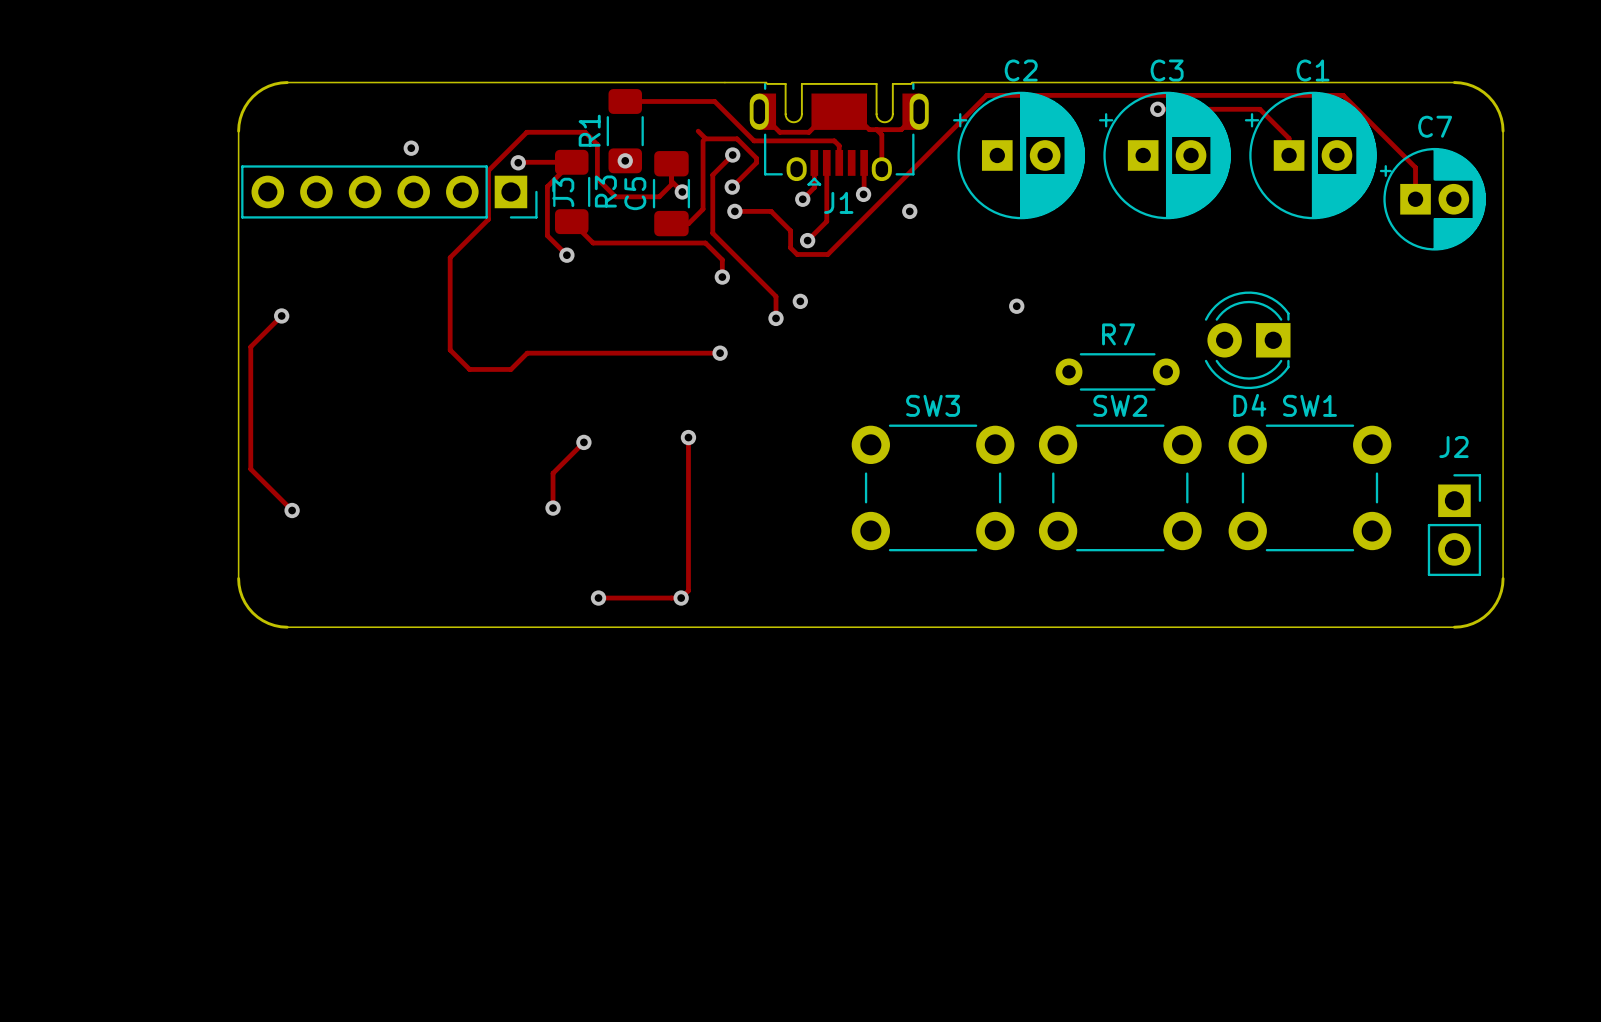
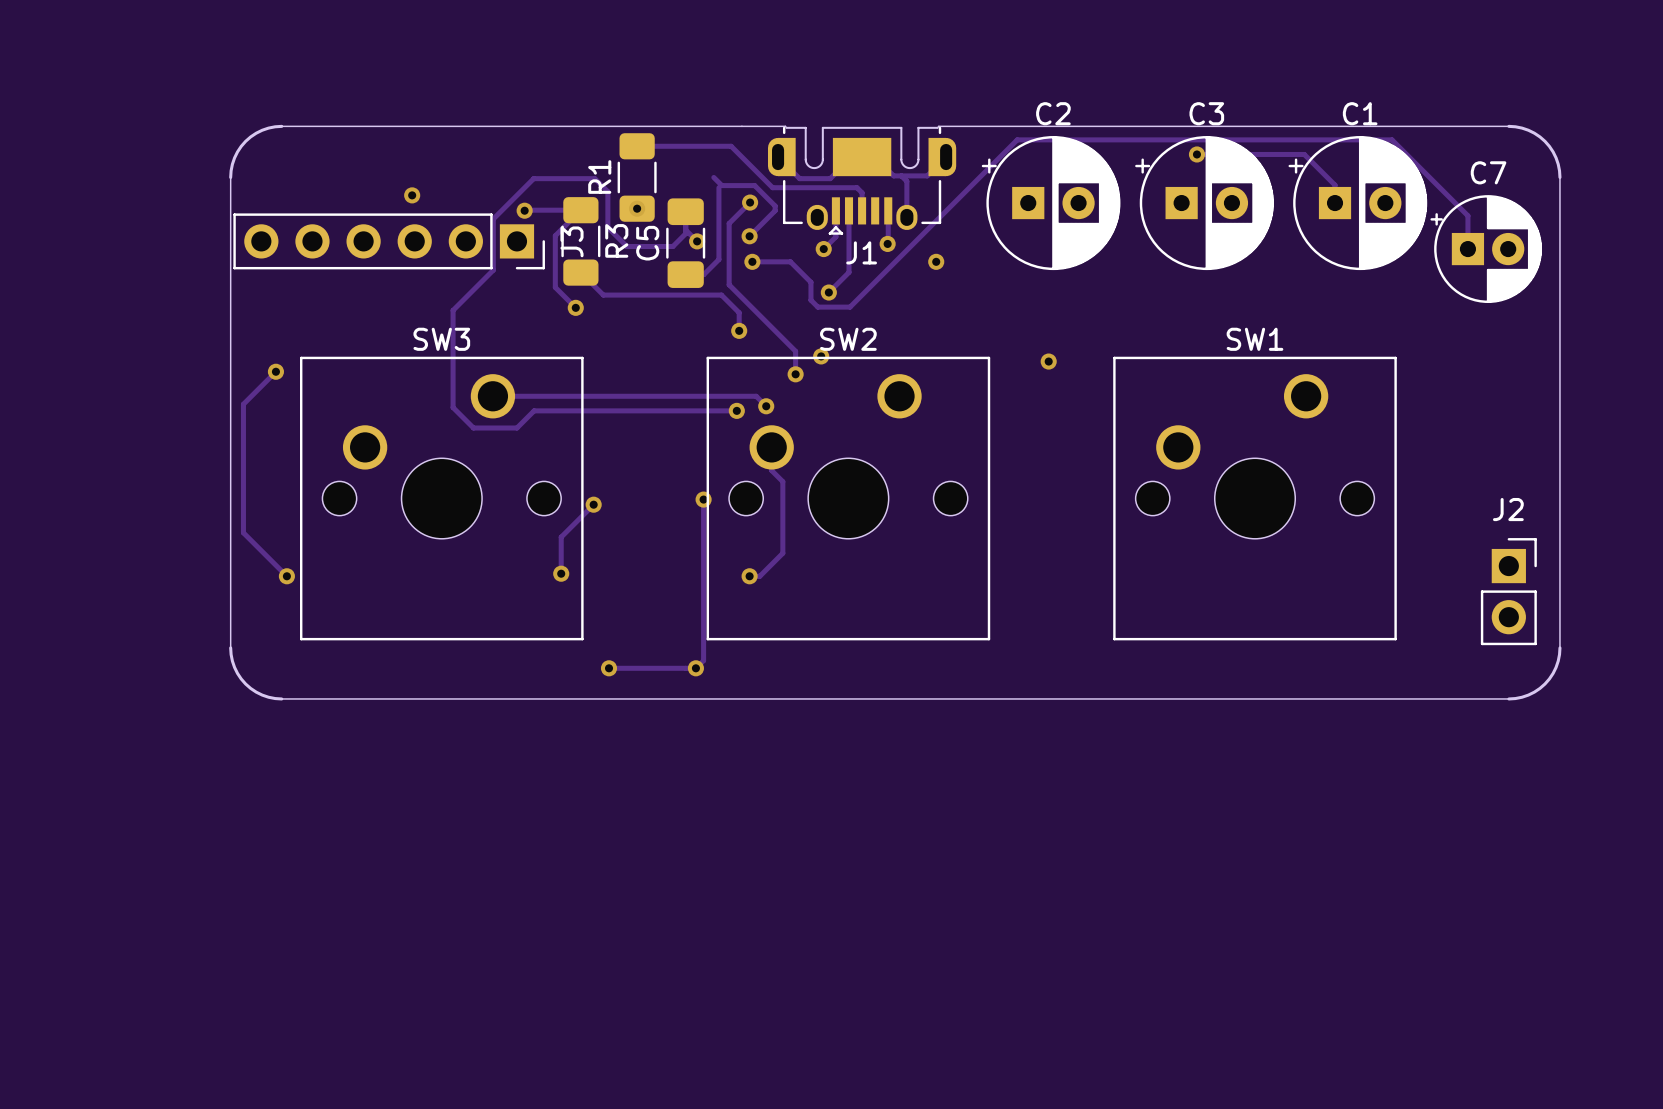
track: none -> (492, 396) (756, 396) (766, 406)
D4: (1247, 340) -> none
via: none -> (766, 406)
R7: (1117, 371) -> none
track: none -> (771, 447) (771, 470) (782, 481) (782, 553) (759, 576) (749, 576)
SW3 name position: SW3 (933, 405) -> SW3 (441, 339)
SW2 name position: SW2 (1120, 405) -> SW2 (848, 339)
SW1 name position: SW1 (1309, 405) -> SW1 (1255, 339)
SW3 footprint: [851, 424, 1015, 552] -> [299, 356, 584, 641]
SW2 footprint: [1038, 424, 1202, 552] -> [706, 356, 991, 641]
SW1 footprint: [1228, 424, 1392, 552] -> [1113, 356, 1397, 641]
via: none -> (749, 576)

